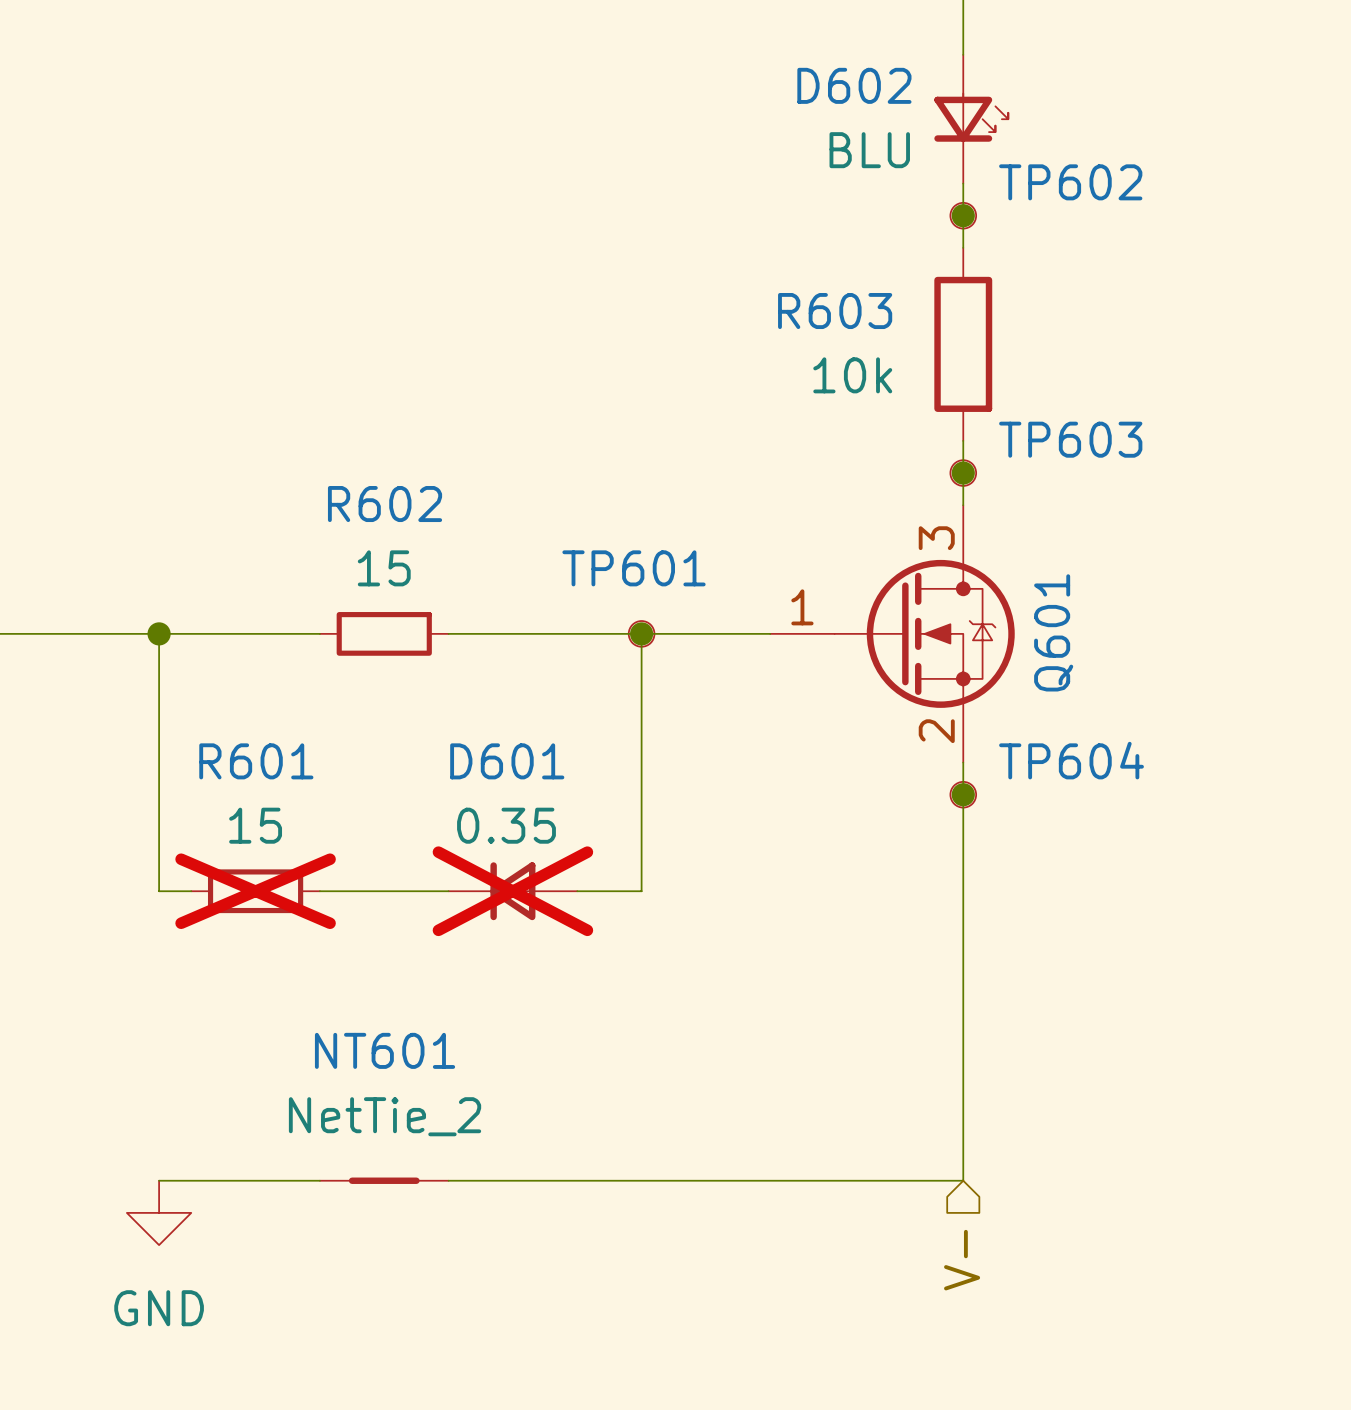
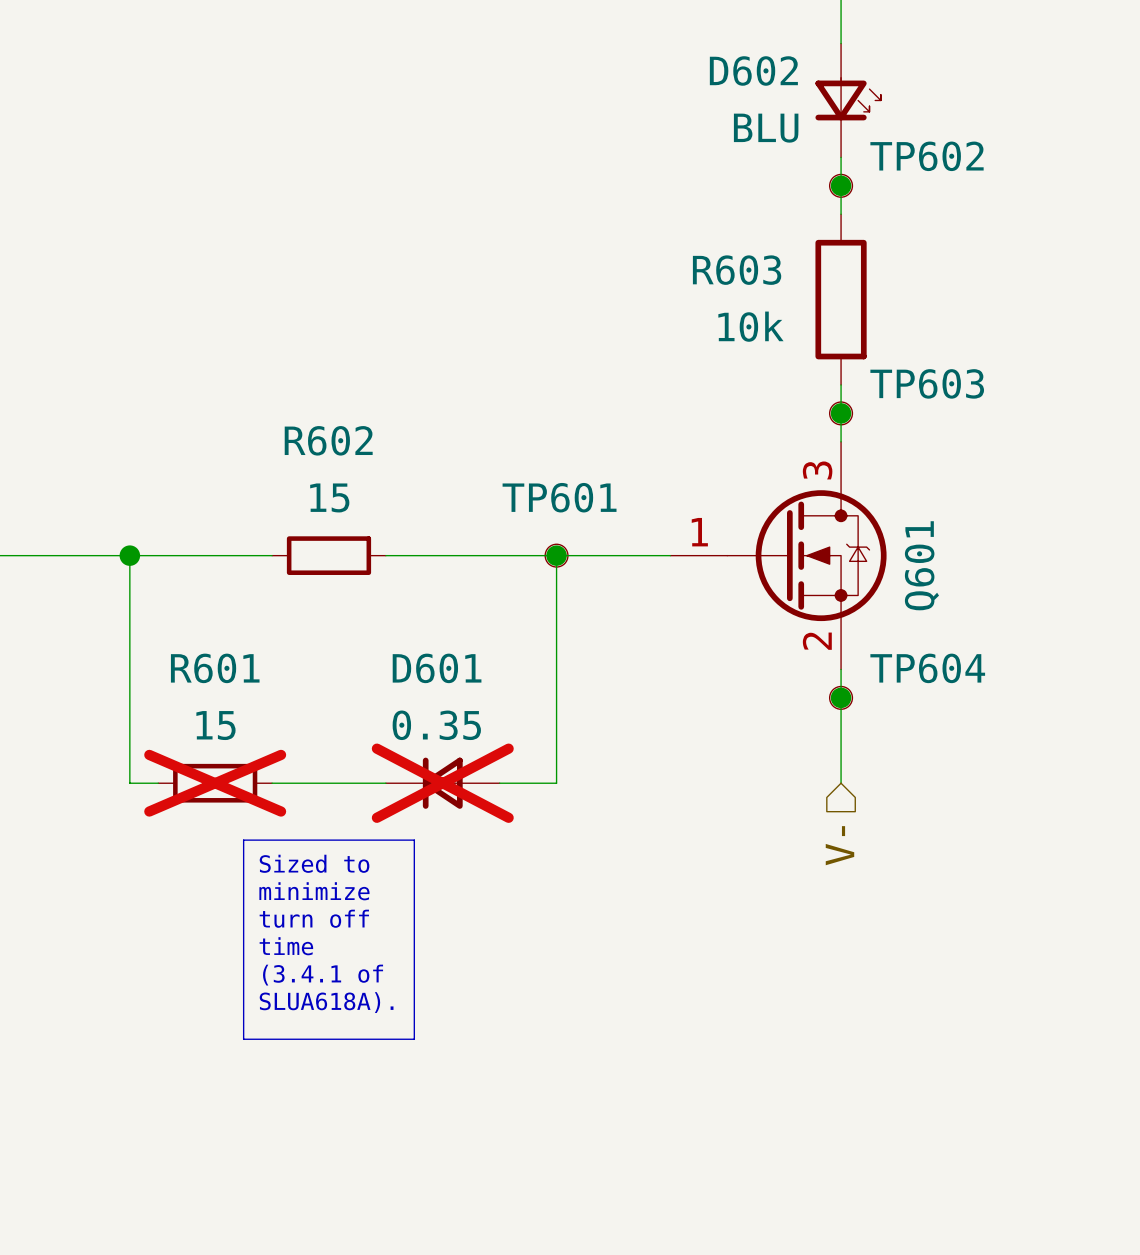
wire: (963, 891) (963, 1180) (448, 1180) -> none
line: none -> (243, 840) (414, 840) (414, 1039) (243, 1039) (243, 840)
text: none -> Sized to (314, 863)
text: none -> minimize (314, 891)
text: none -> turn off (314, 918)
text: none -> time (286, 946)
text: none -> (3.4.1 of (323, 975)
text: none -> SLUA618A). (326, 1002)
wire: (159, 1180) (319, 1180) -> none
NT601: NetTie_2 (384, 1180) -> none
power symbol: GND (159, 1212) -> none
hierarchical label position: V- (962, 1260) -> V- (839, 845)

